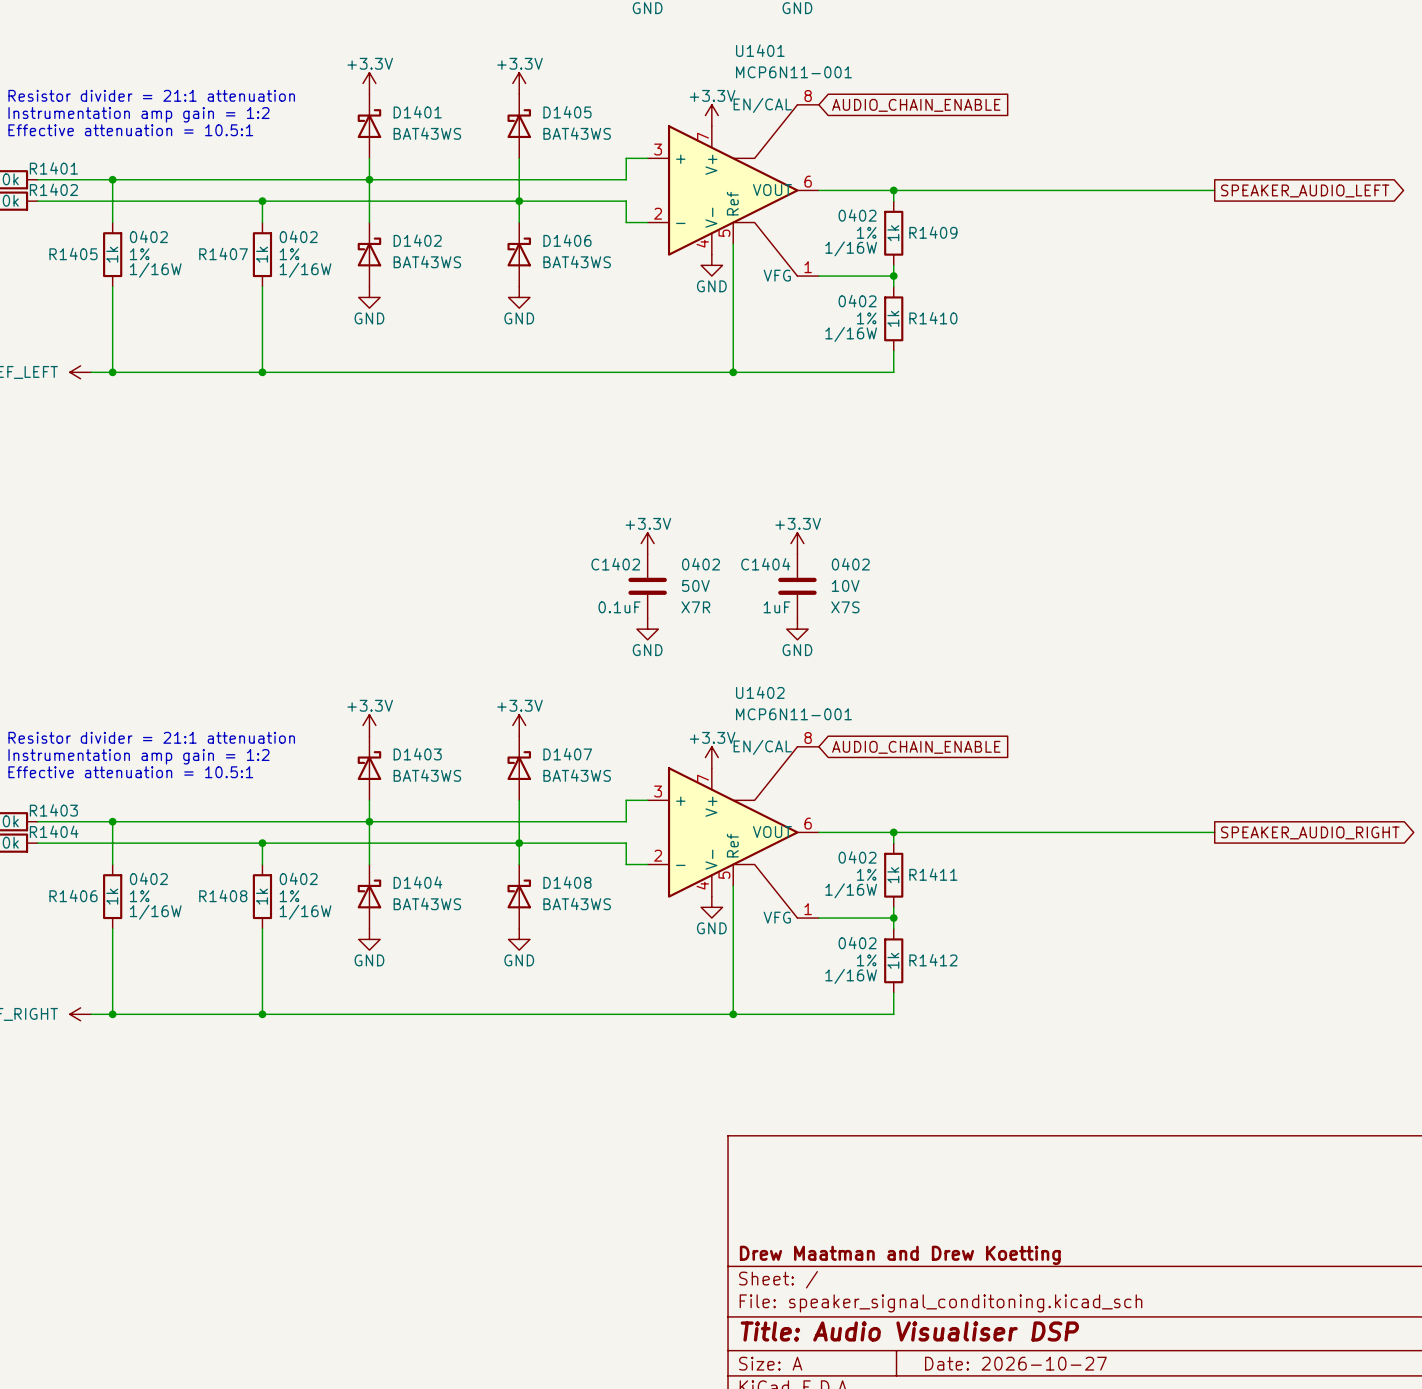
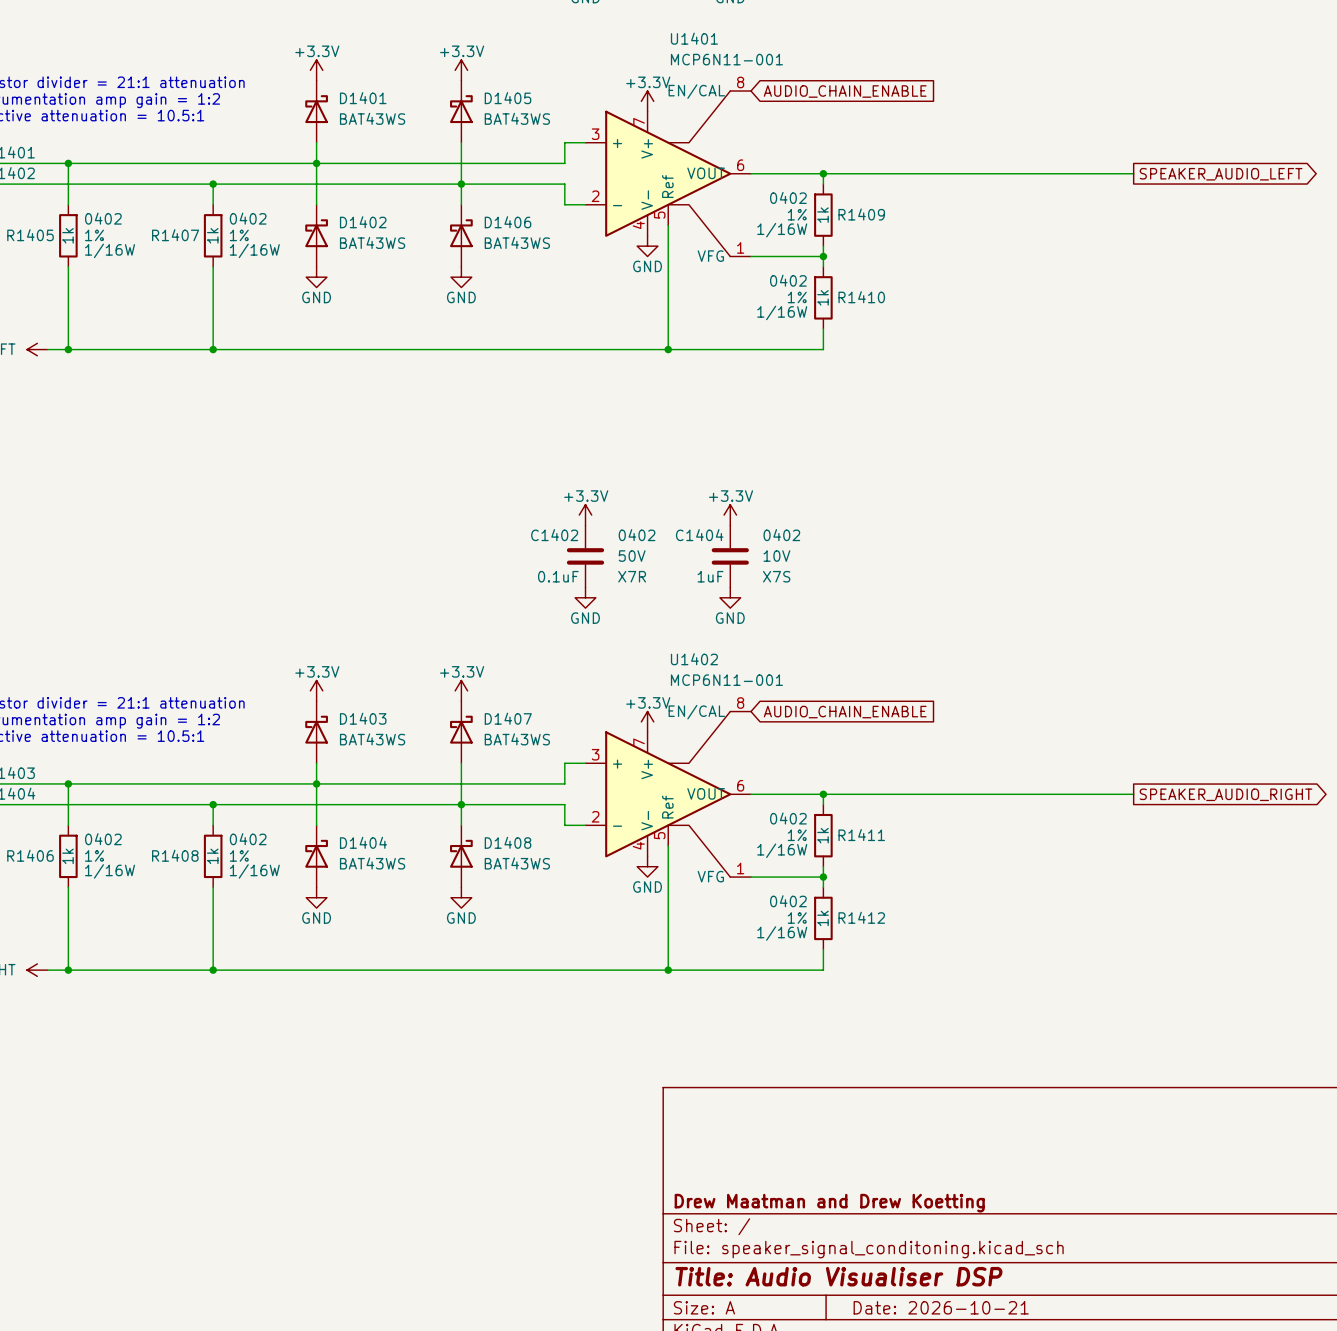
title block: Date: 2026-10-27 (1015, 1363) -> Date: 2026-10-21 (941, 1307)

